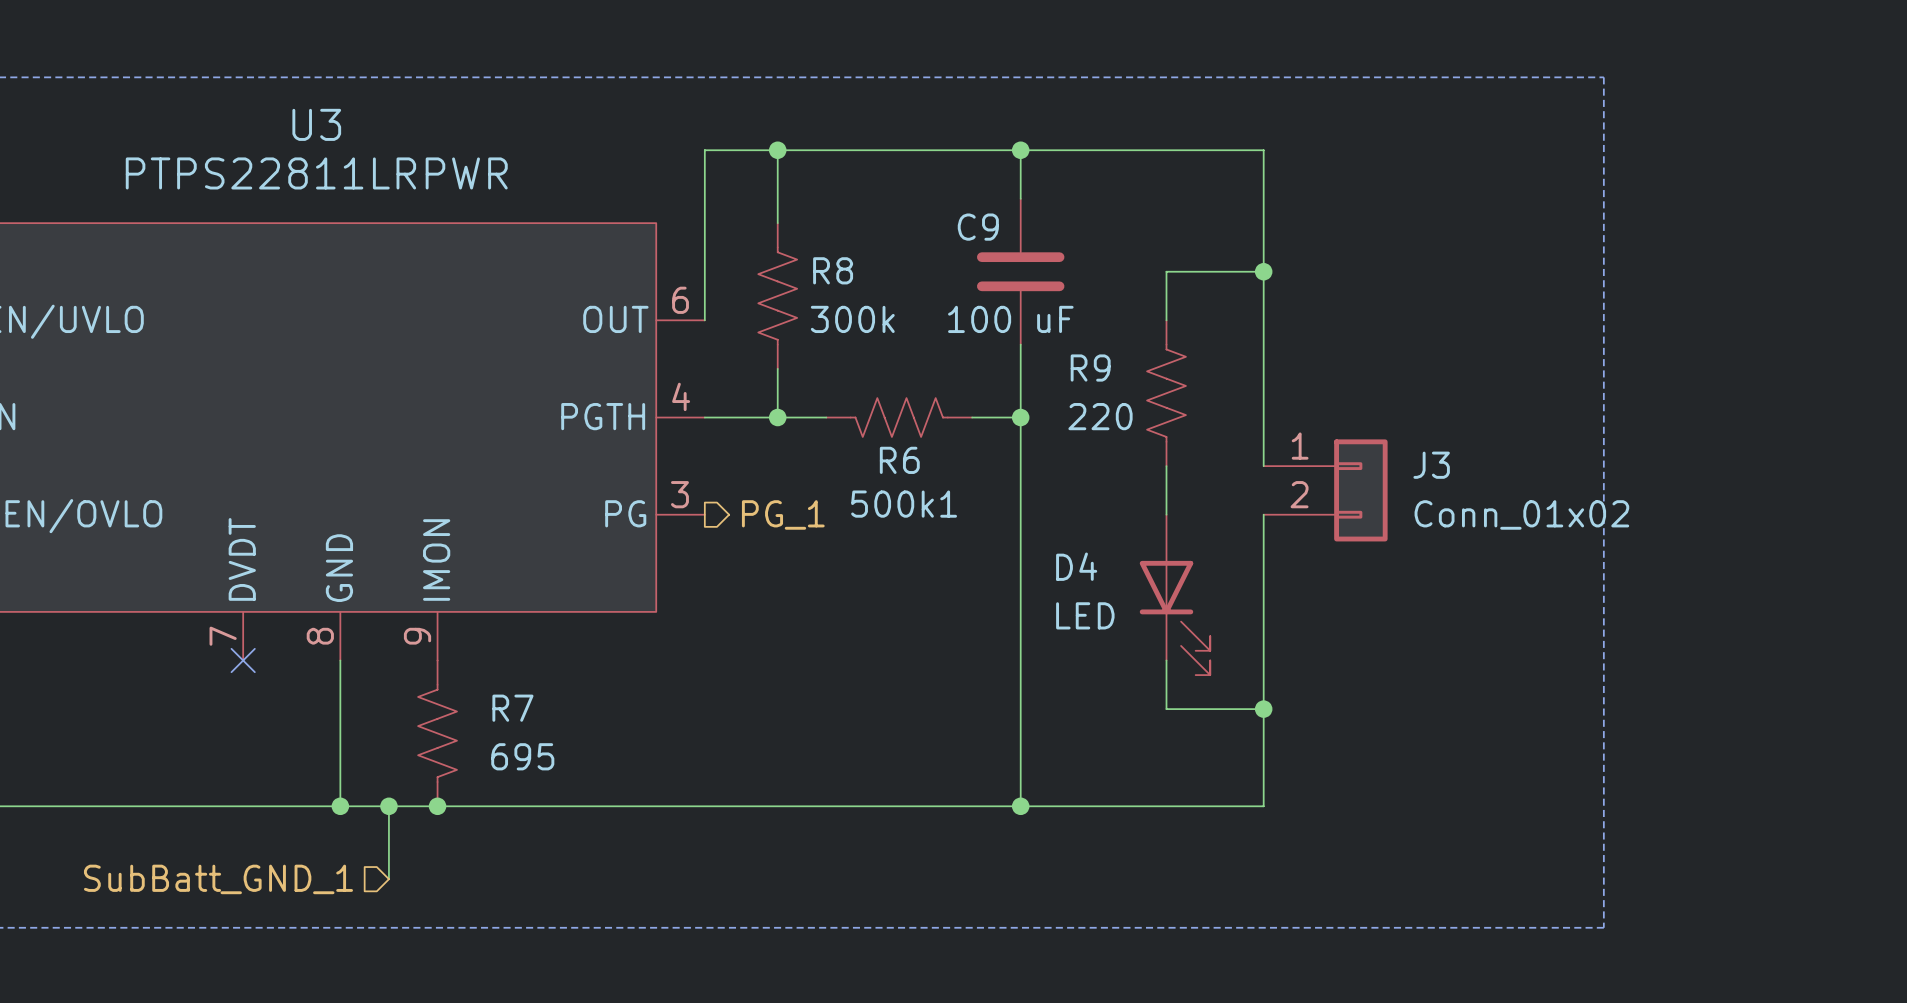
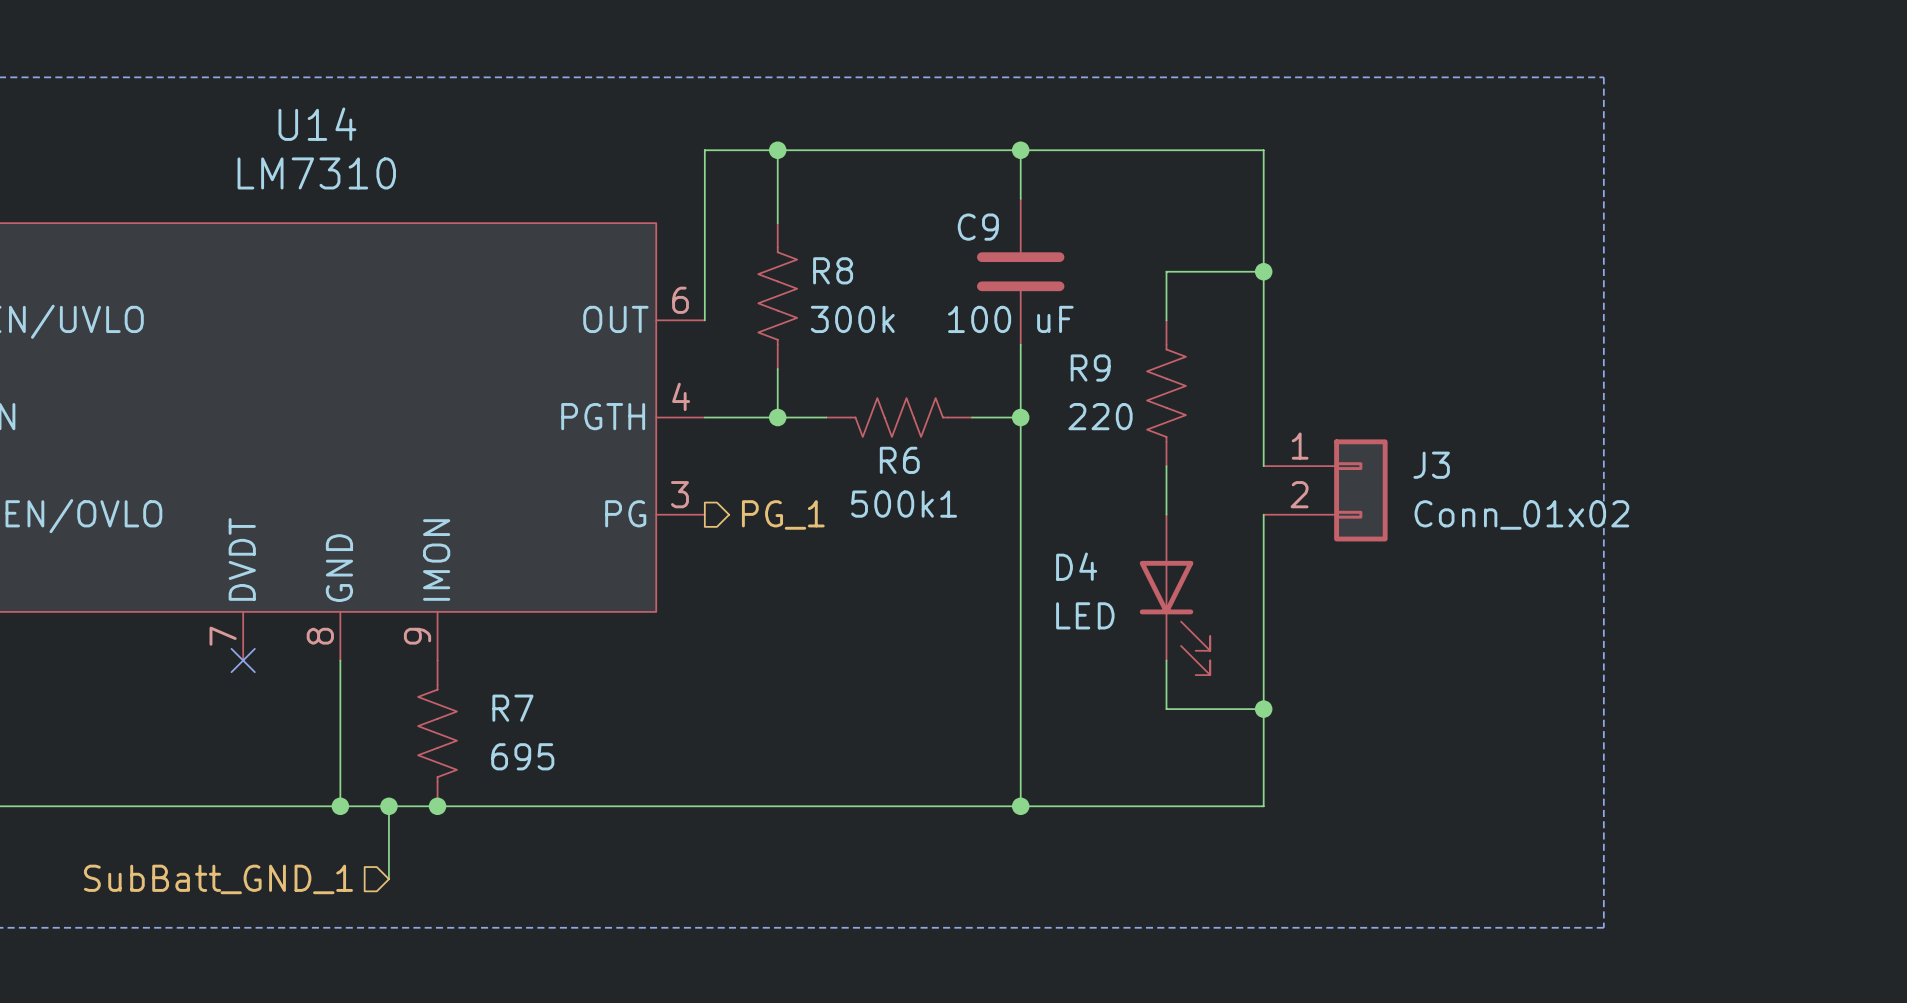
U3 name: U3 (316, 124) -> U14 (317, 124)
U3 value: PTPS22811LRPWR (316, 173) -> LM7310 (316, 173)

